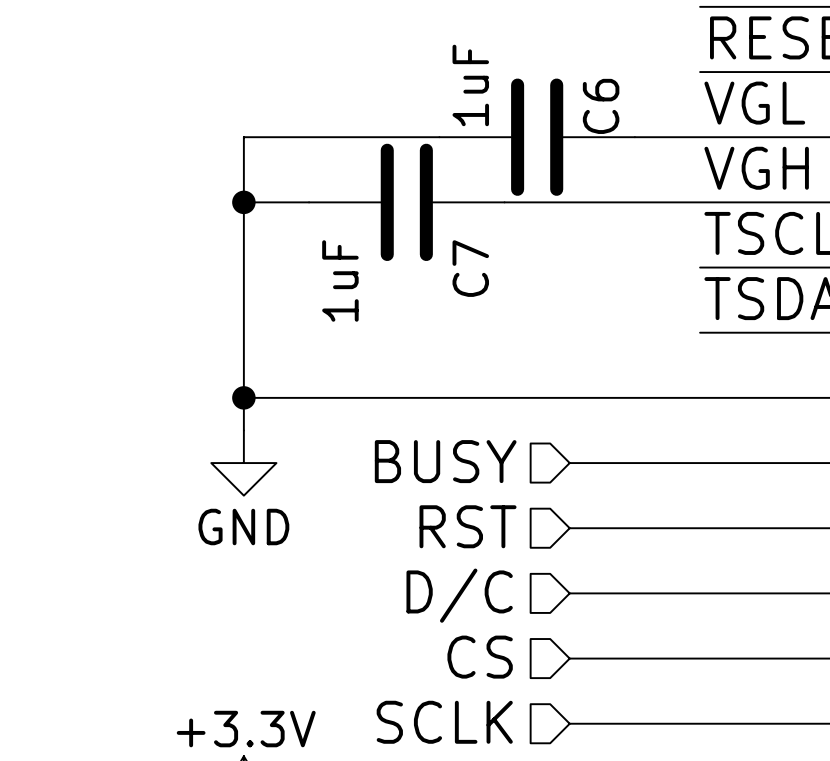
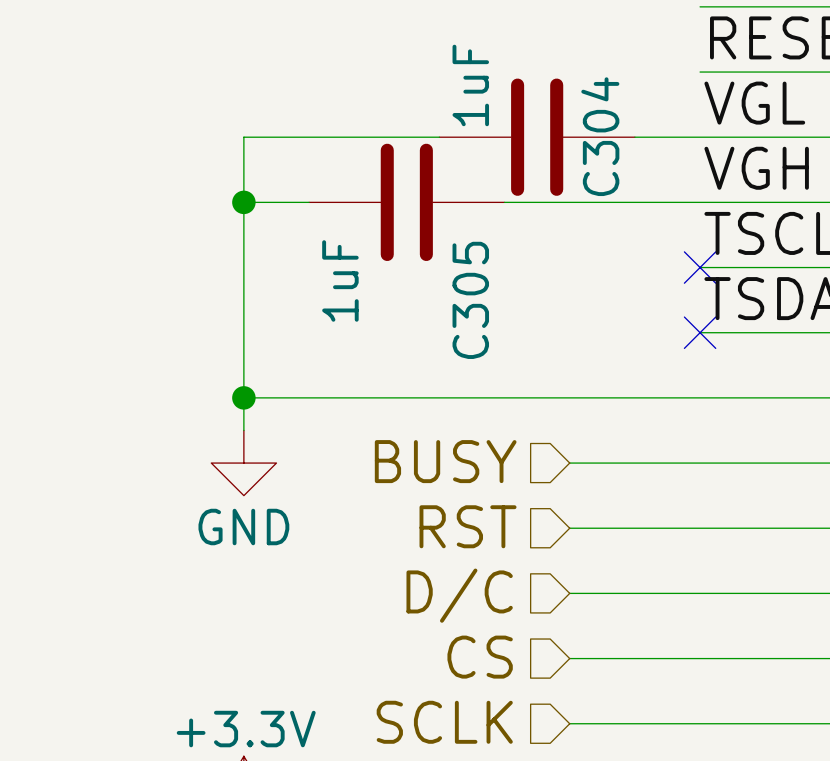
C6 name: C6 (601, 106) -> C304 (600, 136)
no-connect mark: none -> (700, 267)
C7 name: C7 (470, 268) -> C305 (470, 300)
no-connect mark: none -> (700, 332)

